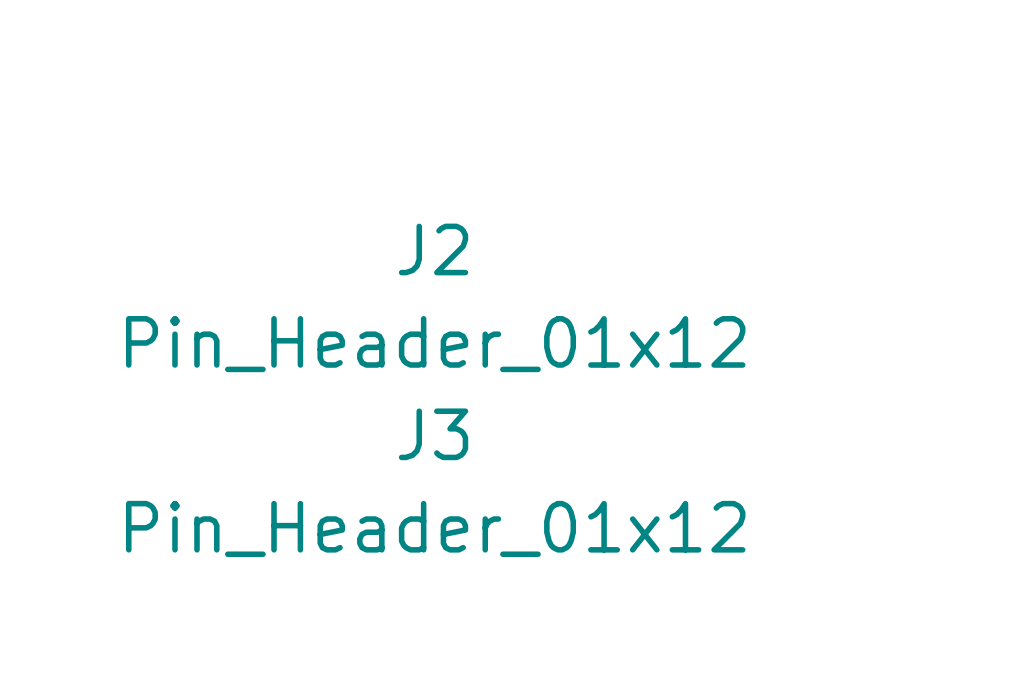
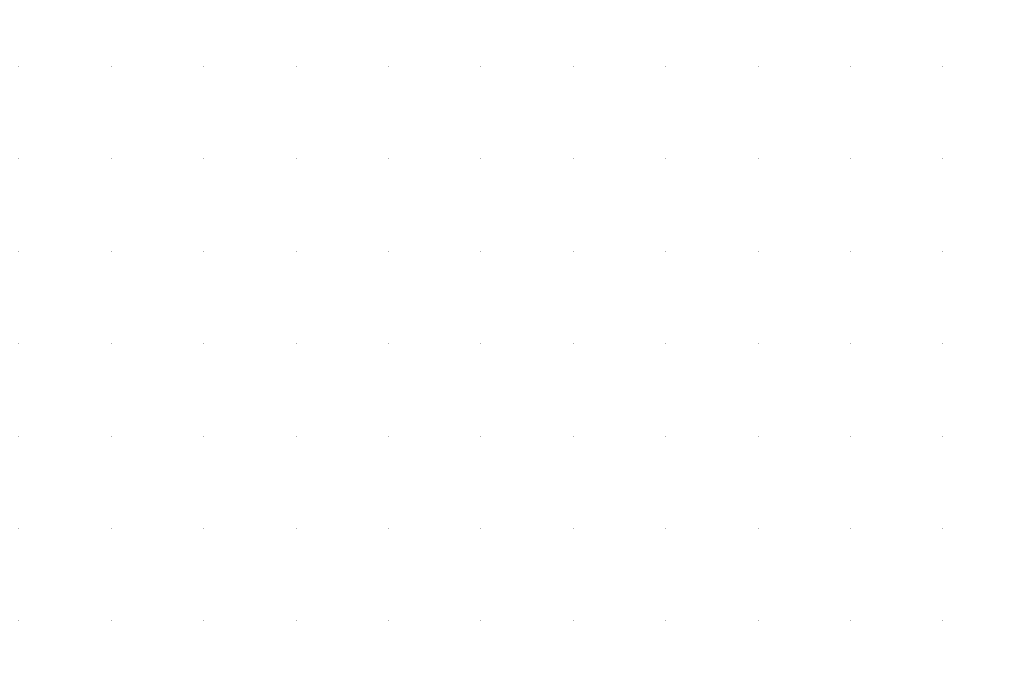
J2: Pin_Header_01x12 (435, 297) -> none
J3: Pin_Header_01x12 (435, 482) -> none

